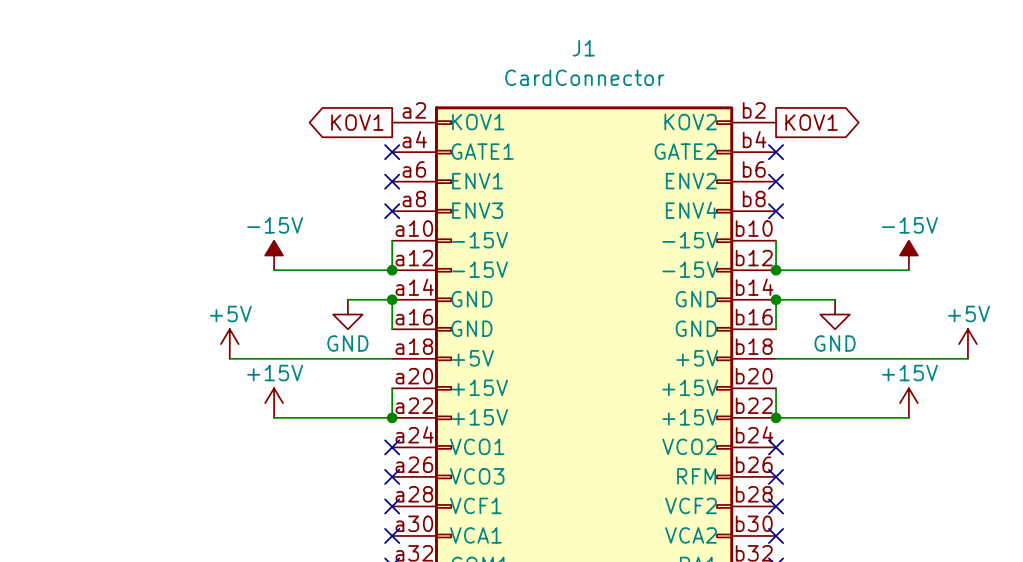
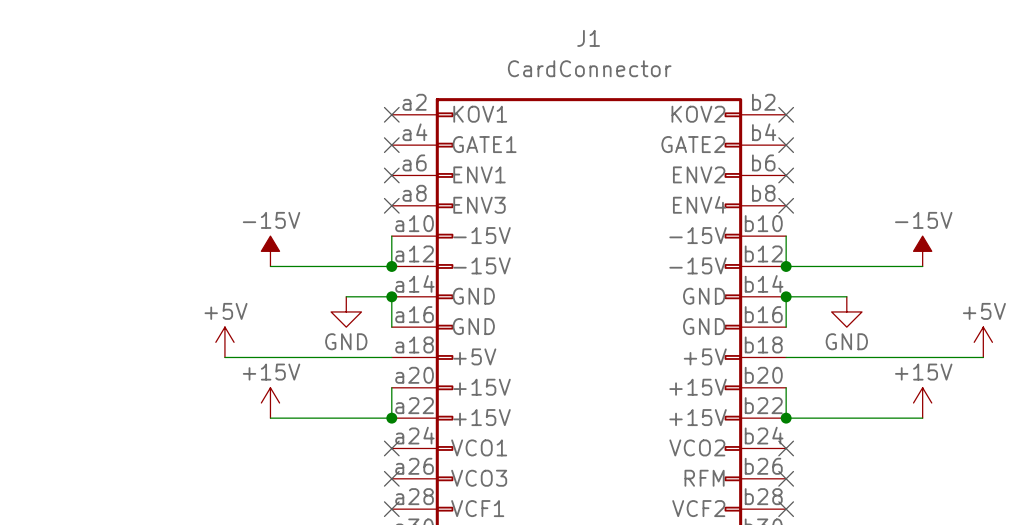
global label: KOV1 (357, 122) -> none
no-connect mark: none -> (391, 114)
no-connect mark: none -> (786, 114)
global label: KOV1 (811, 122) -> none

